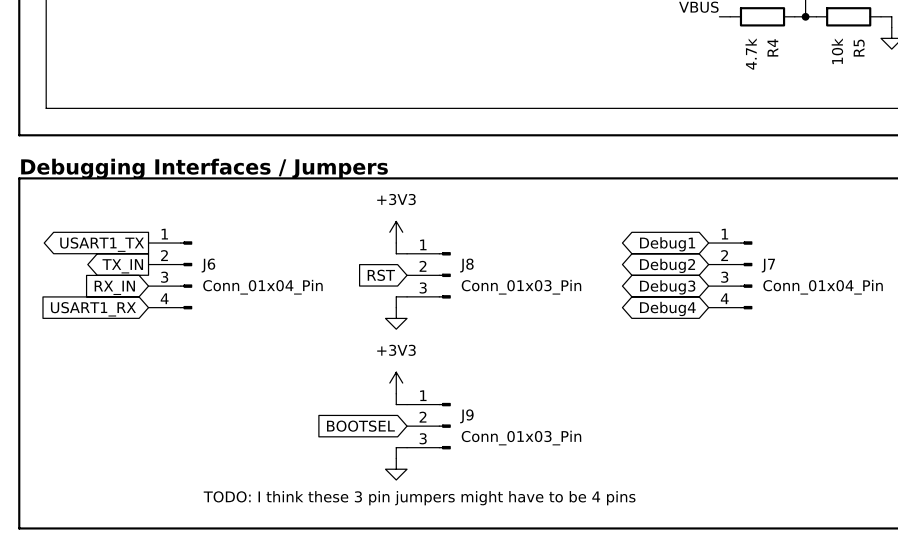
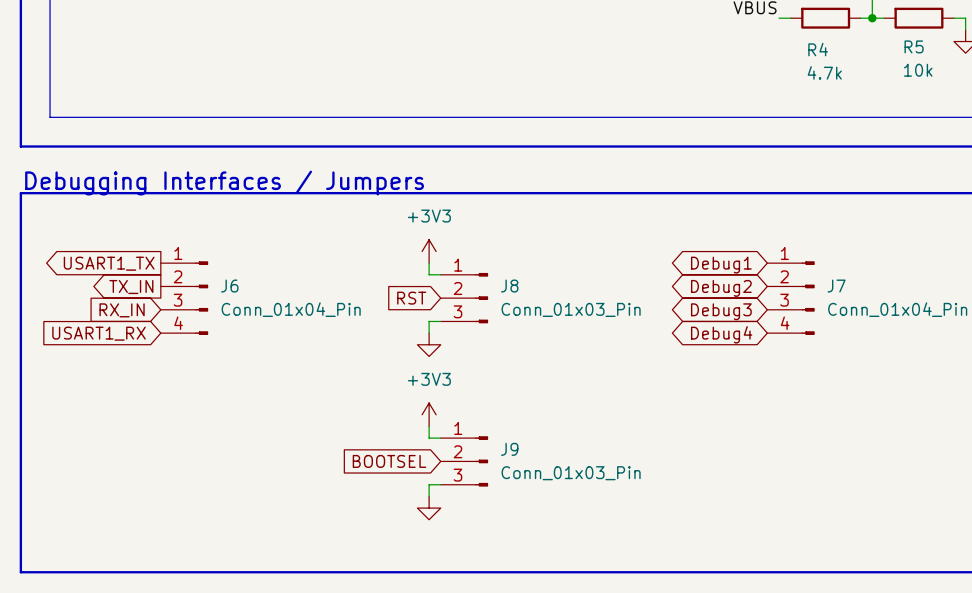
R4 name rotation: 0° (772, 47) -> 90° clockwise (818, 49)
R5 name rotation: 0° (859, 48) -> 90° clockwise (914, 46)
R5 value rotation: 0° (837, 51) -> 90° clockwise (918, 70)
R4 value rotation: 0° (751, 54) -> 90° clockwise (824, 72)
text: TODO: I think these 3 pin jumpers might have to be 4 pins (419, 498) -> none

